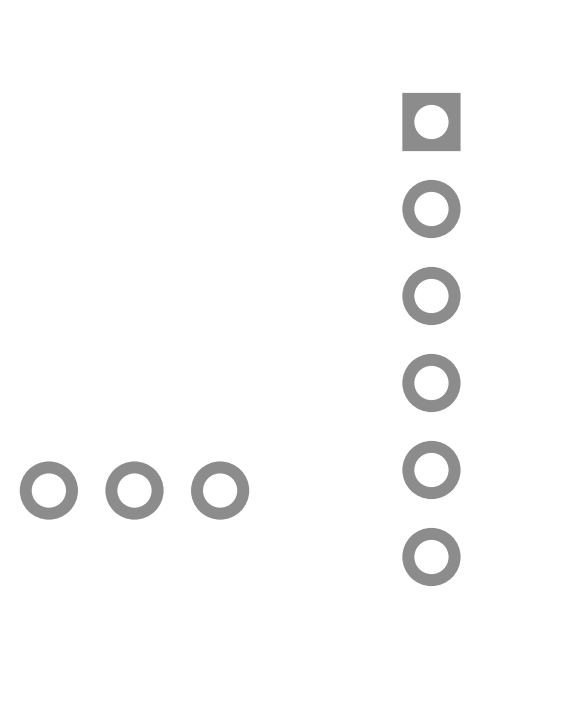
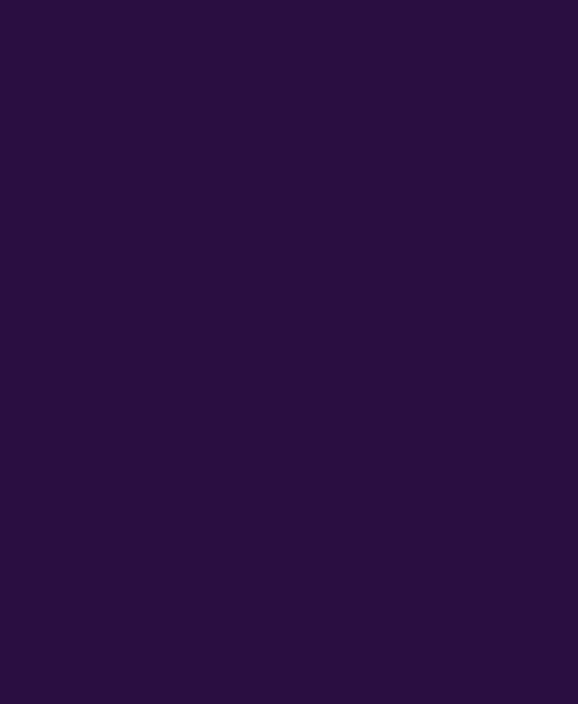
part: (431, 339) -> none
part: (134, 490) -> none

